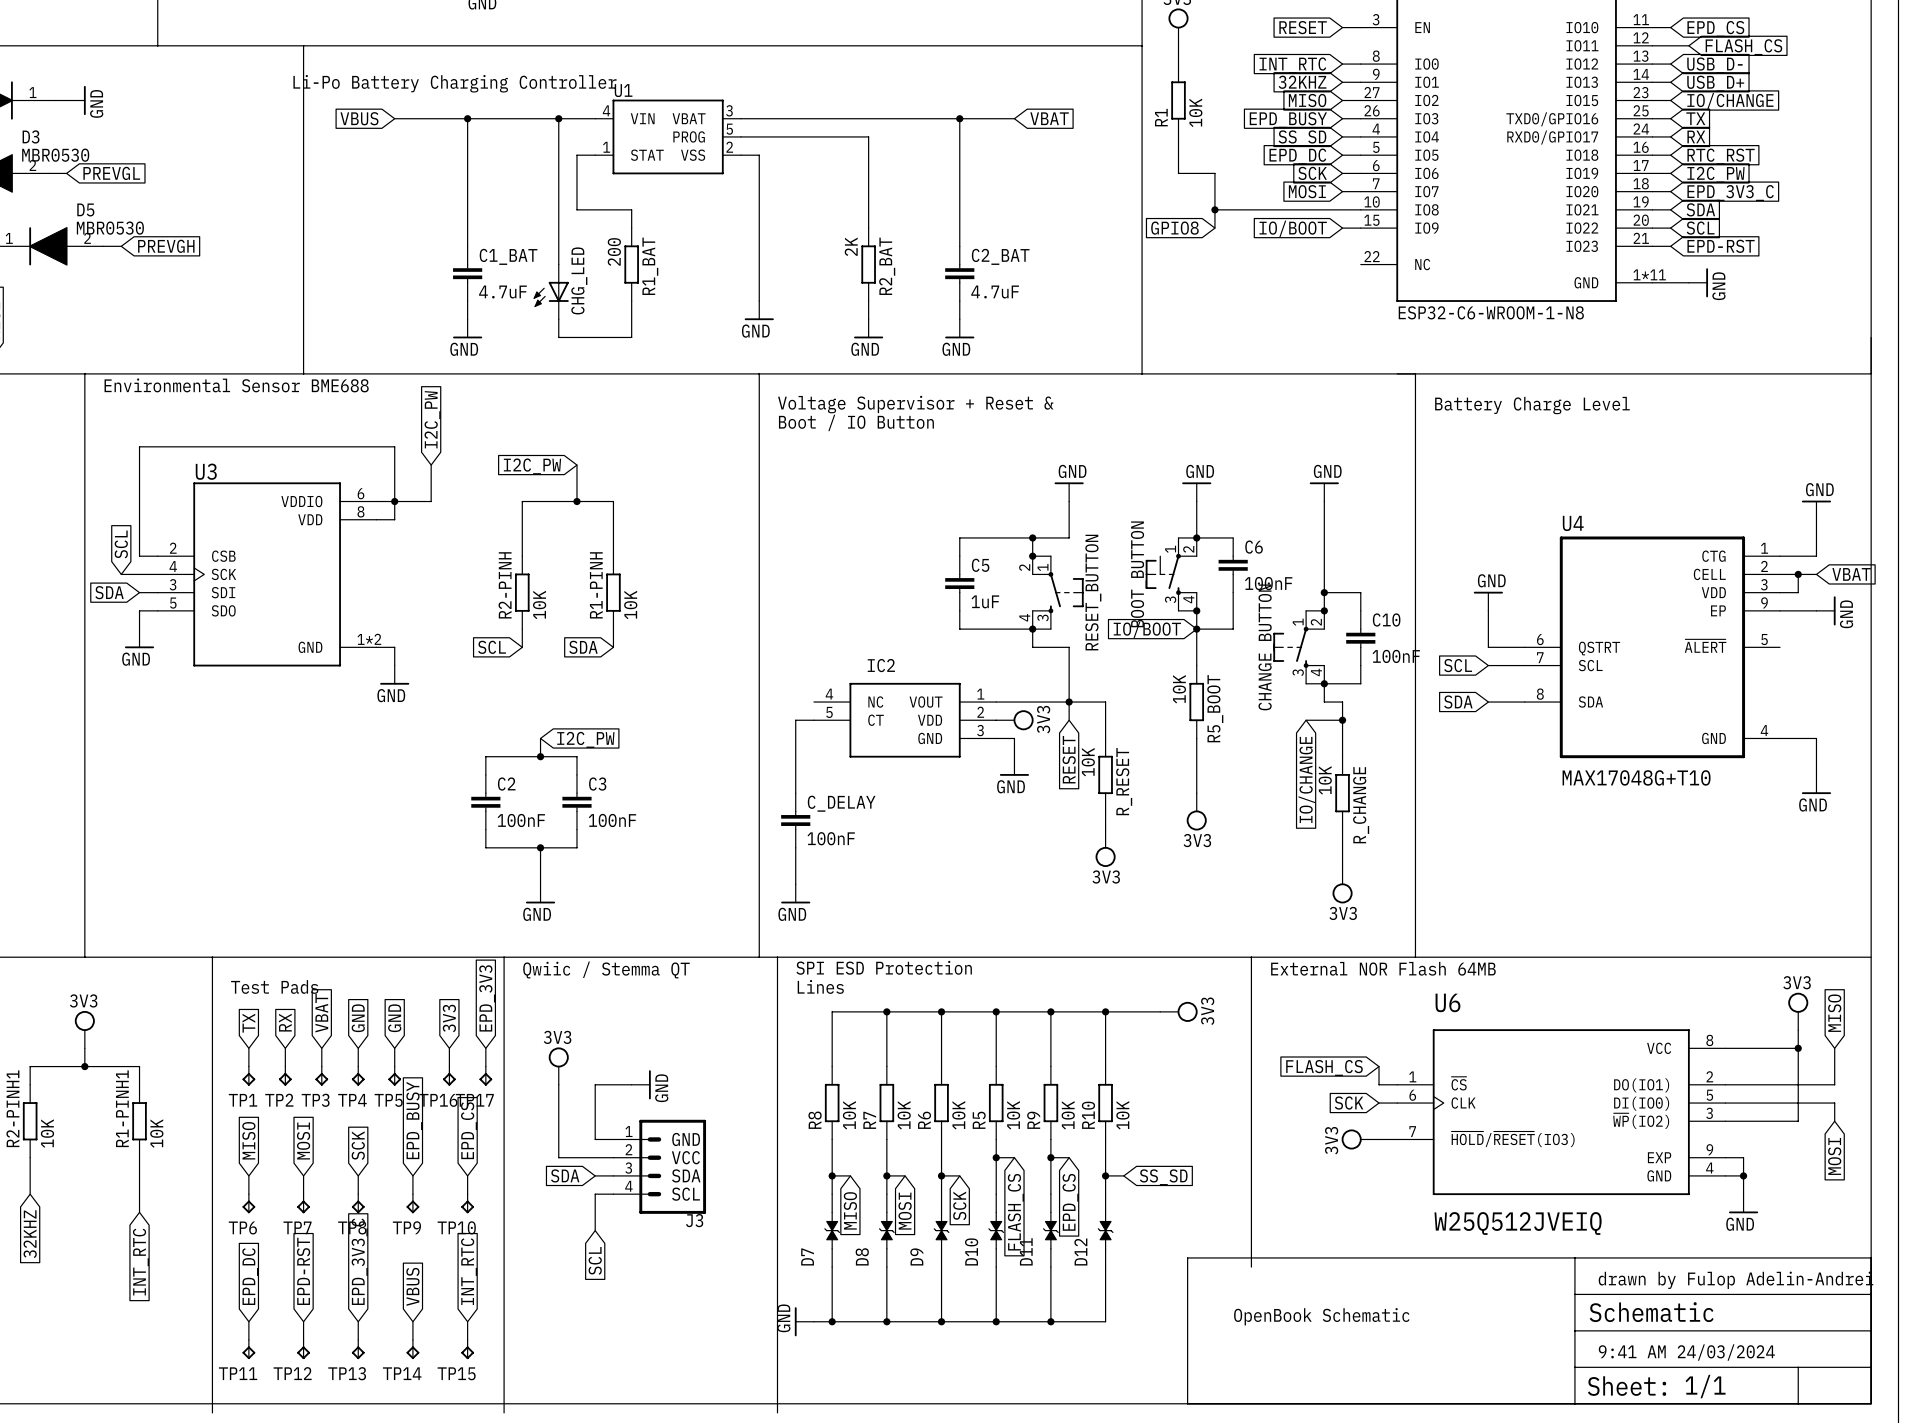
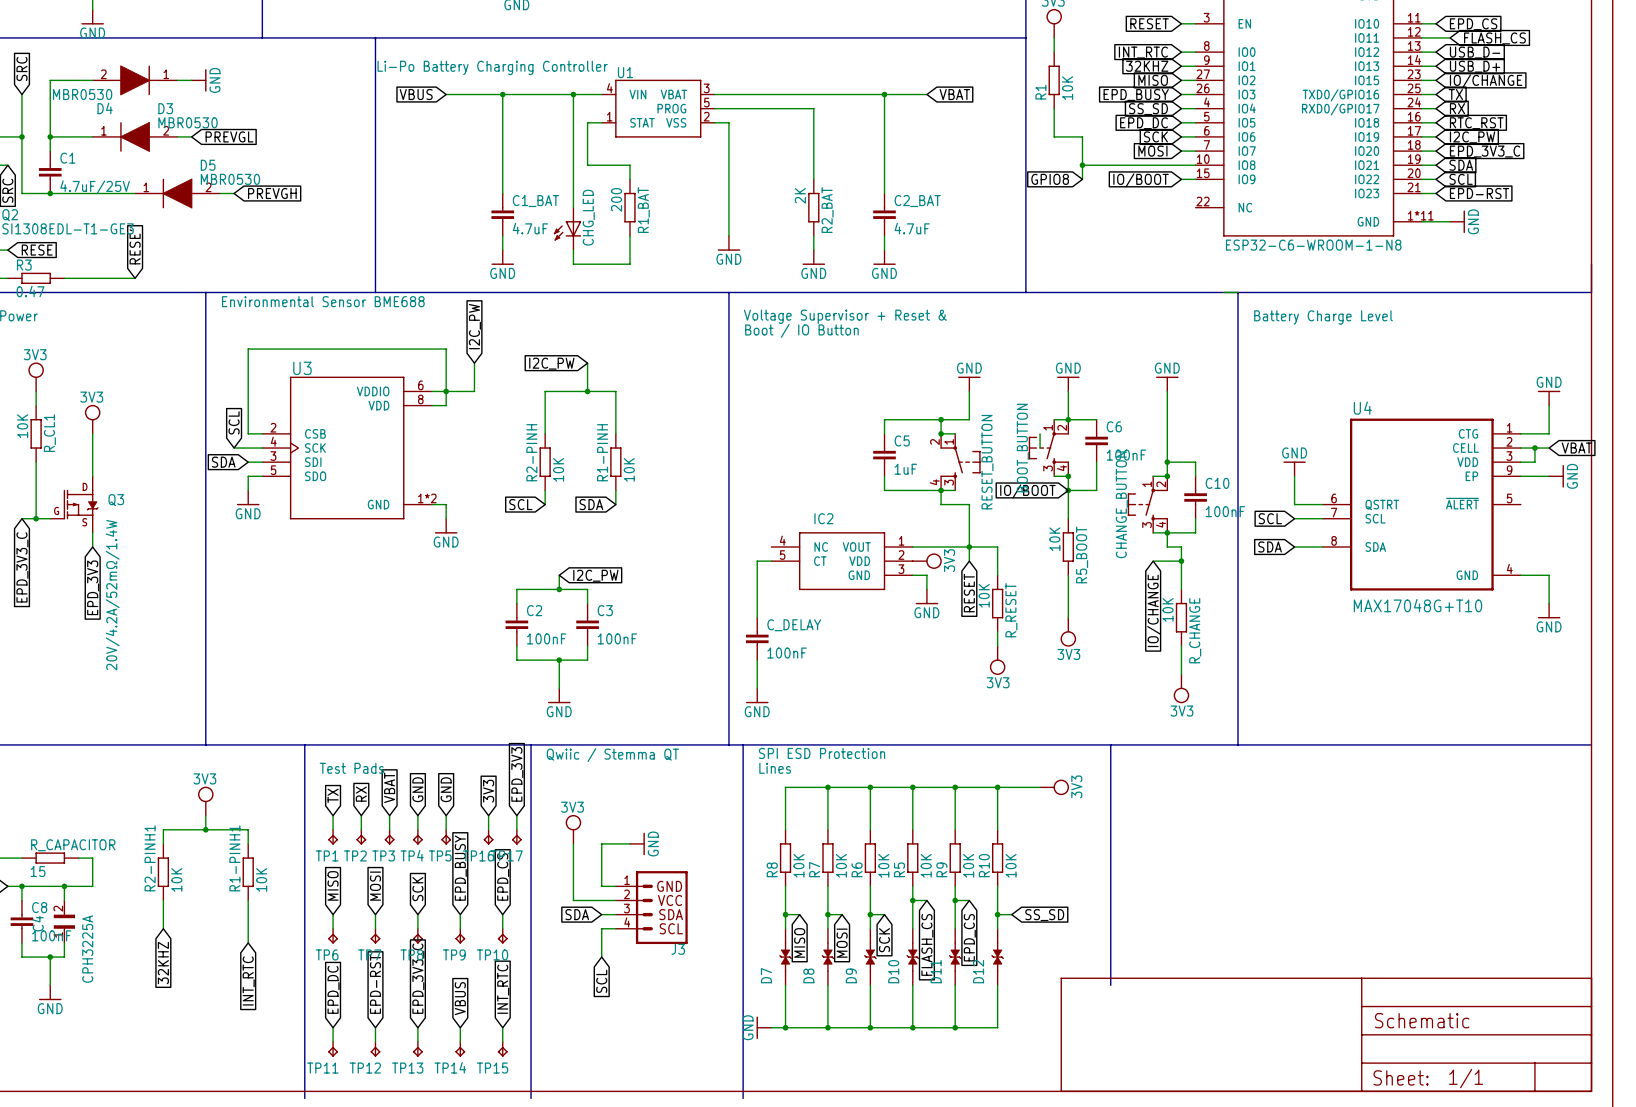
text: External NOR Flash 64MB (1383, 968) -> none
power symbol: 3V3 (1798, 1011) -> none
global label: MISO (1834, 1013) -> none
wire: (1798, 1030) (1798, 1121) (1725, 1121) -> none
wire: (1725, 1048) (1798, 1048) -> none
junction: (1798, 1048) -> none
wire: (1834, 1048) (1834, 1084) (1725, 1084) -> none
wire: (1379, 1066) (1379, 1084) (1397, 1084) -> none
global label: FLASH_CS (1324, 1068) -> none
global label: SCK (1349, 1103) -> none
wire: (1379, 1103) (1397, 1103) -> none
wire: (1725, 1103) (1834, 1103) (1834, 1121) -> none
U6: W25Q512JVEIQ (1561, 1112) -> none
power symbol: 3V3 (1360, 1139) -> none
wire: (1379, 1139) (1397, 1139) -> none
global label: MOSI (1834, 1156) -> none
wire: (1725, 1157) (1743, 1157) (1743, 1194) -> none
wire: (1725, 1175) (1743, 1175) -> none
junction: (1743, 1175) -> none
power symbol: GND (1743, 1203) -> none
text: drawn by Fulop Adelin-Andrei (1735, 1280) -> none
text: OpenBook Schematic (1321, 1316) -> none
text: 9:41 AM 24/03/2024 (1686, 1352) -> none

